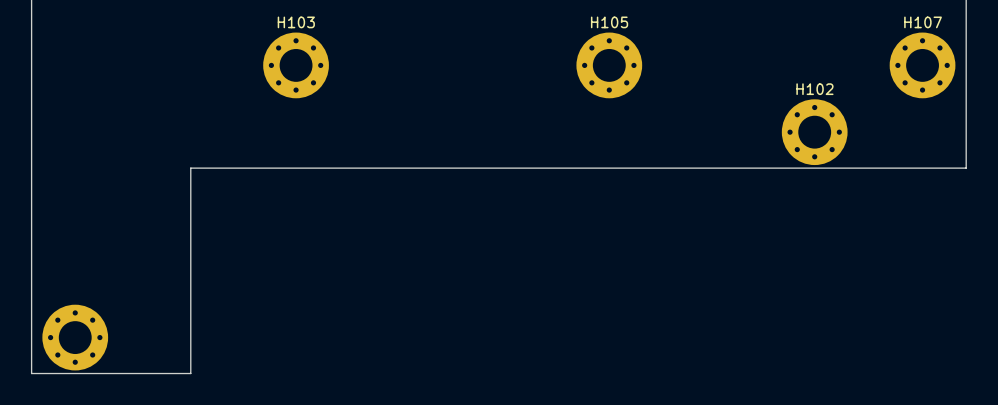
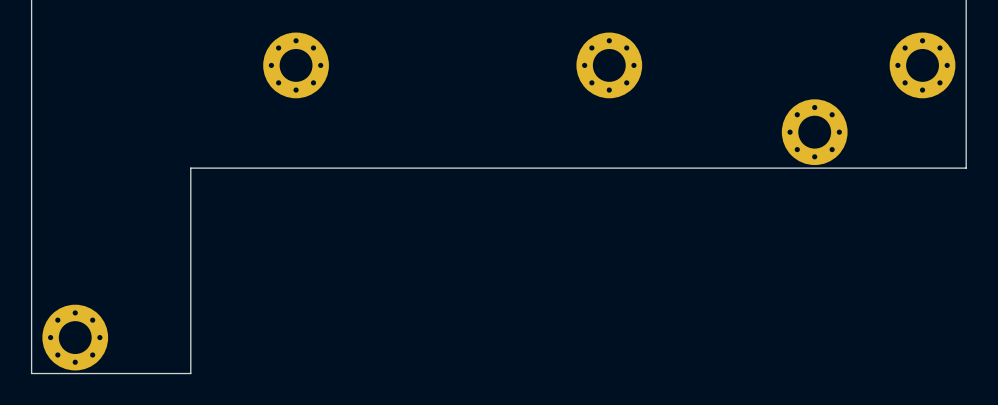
H103 name: H103 (296, 22) -> none
H105 name: H105 (609, 22) -> none
H107 name: H107 (923, 22) -> none
H102 name: H102 (814, 89) -> none

